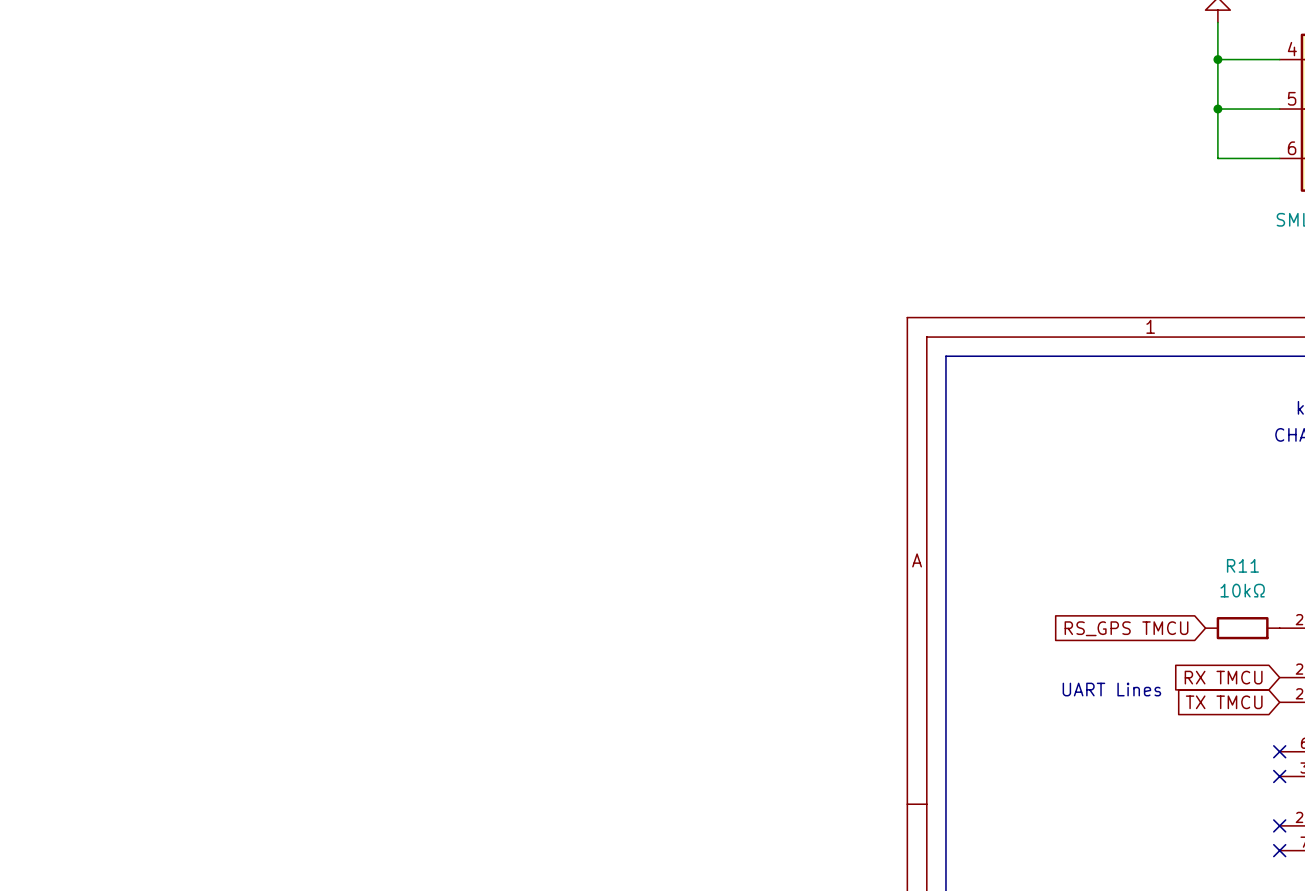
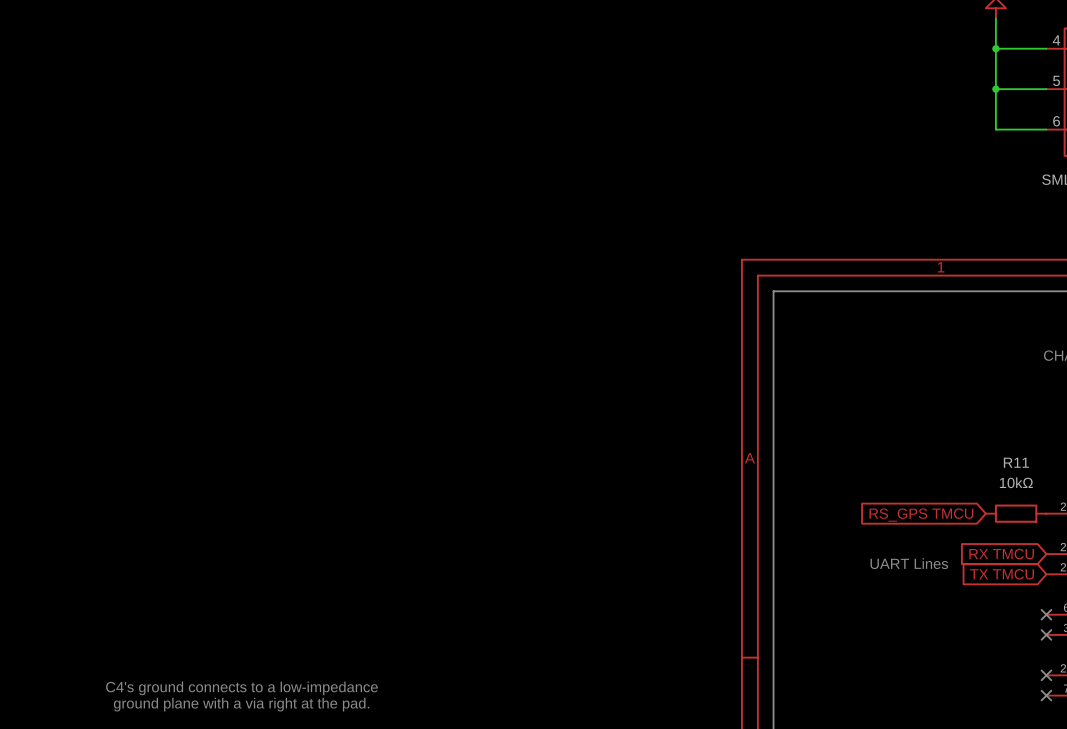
text: none -> C4's ground connects to a low-impedance (241, 688)
text: none -> ground plane with a via right at the pad. (241, 704)

